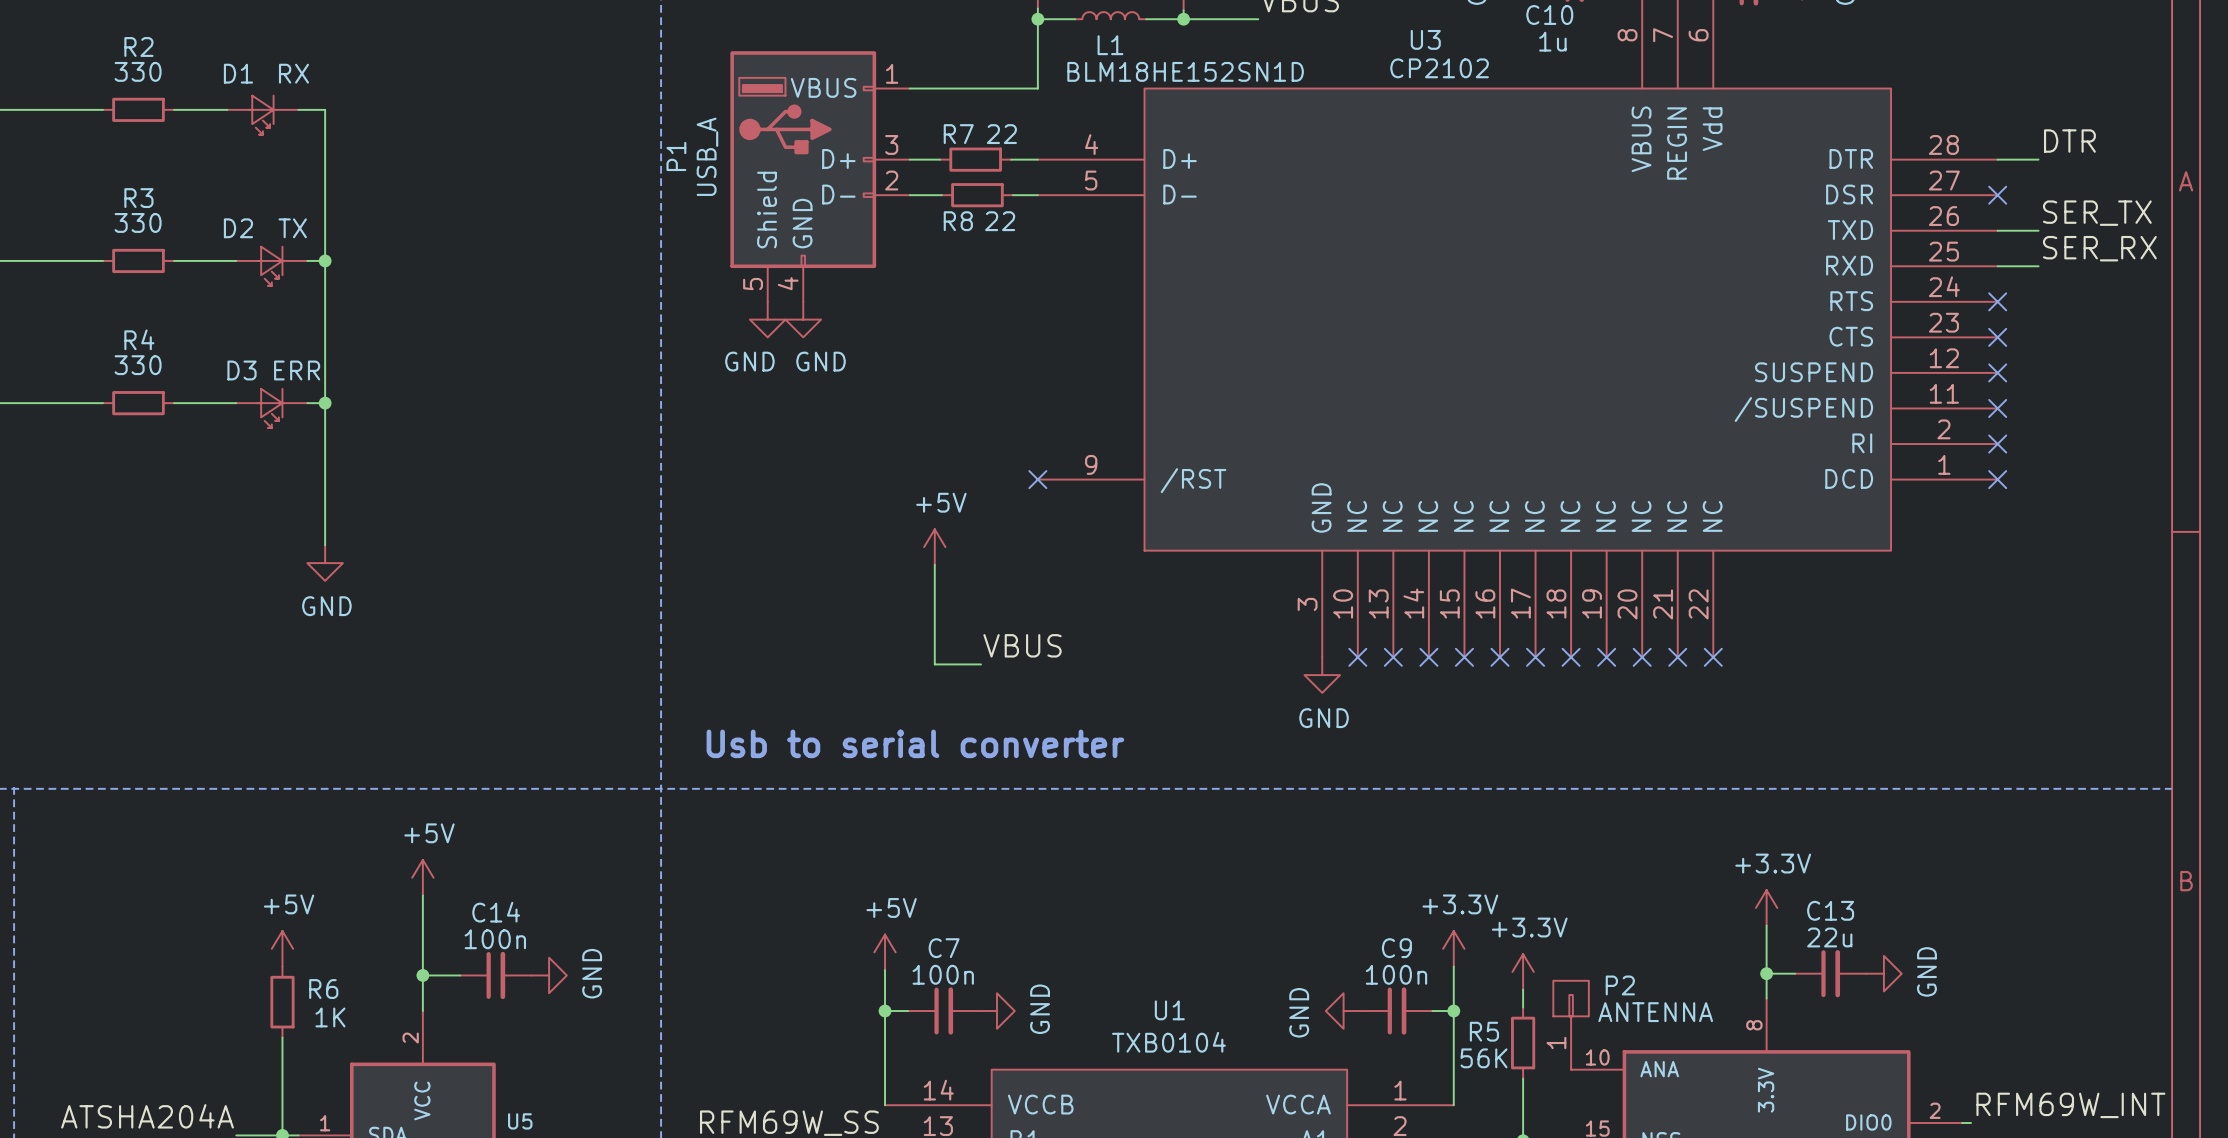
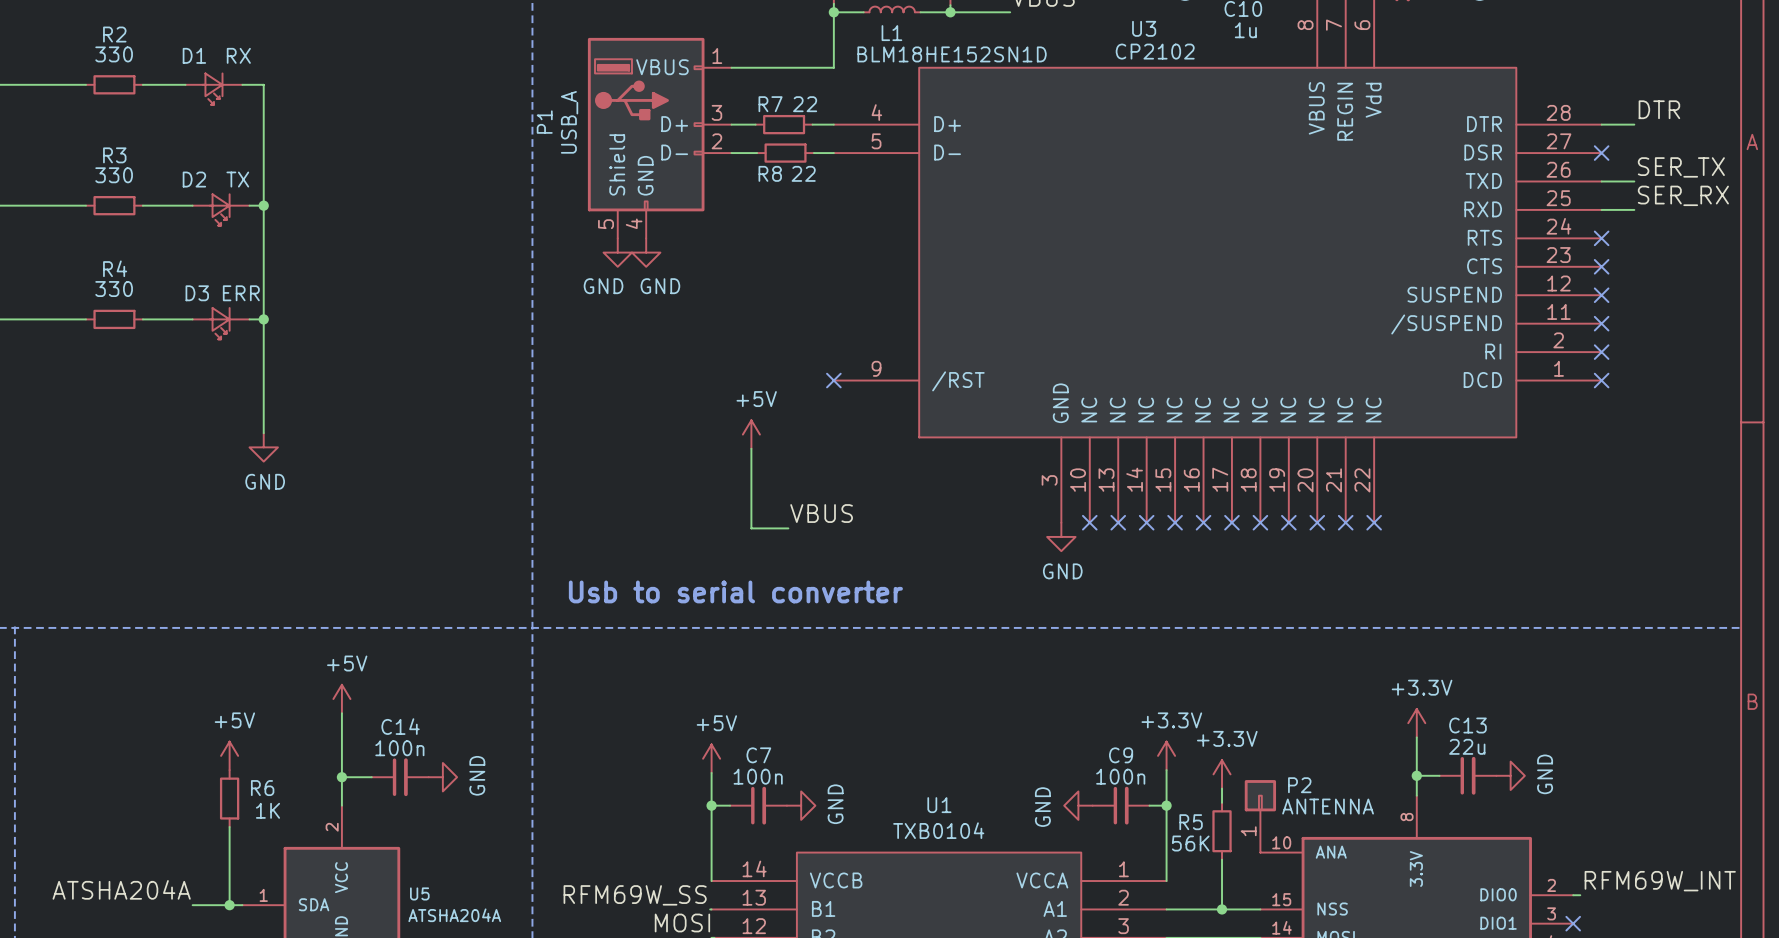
P2 symbol: [1553, 980, 1589, 1070] -> [1244, 780, 1277, 853]

